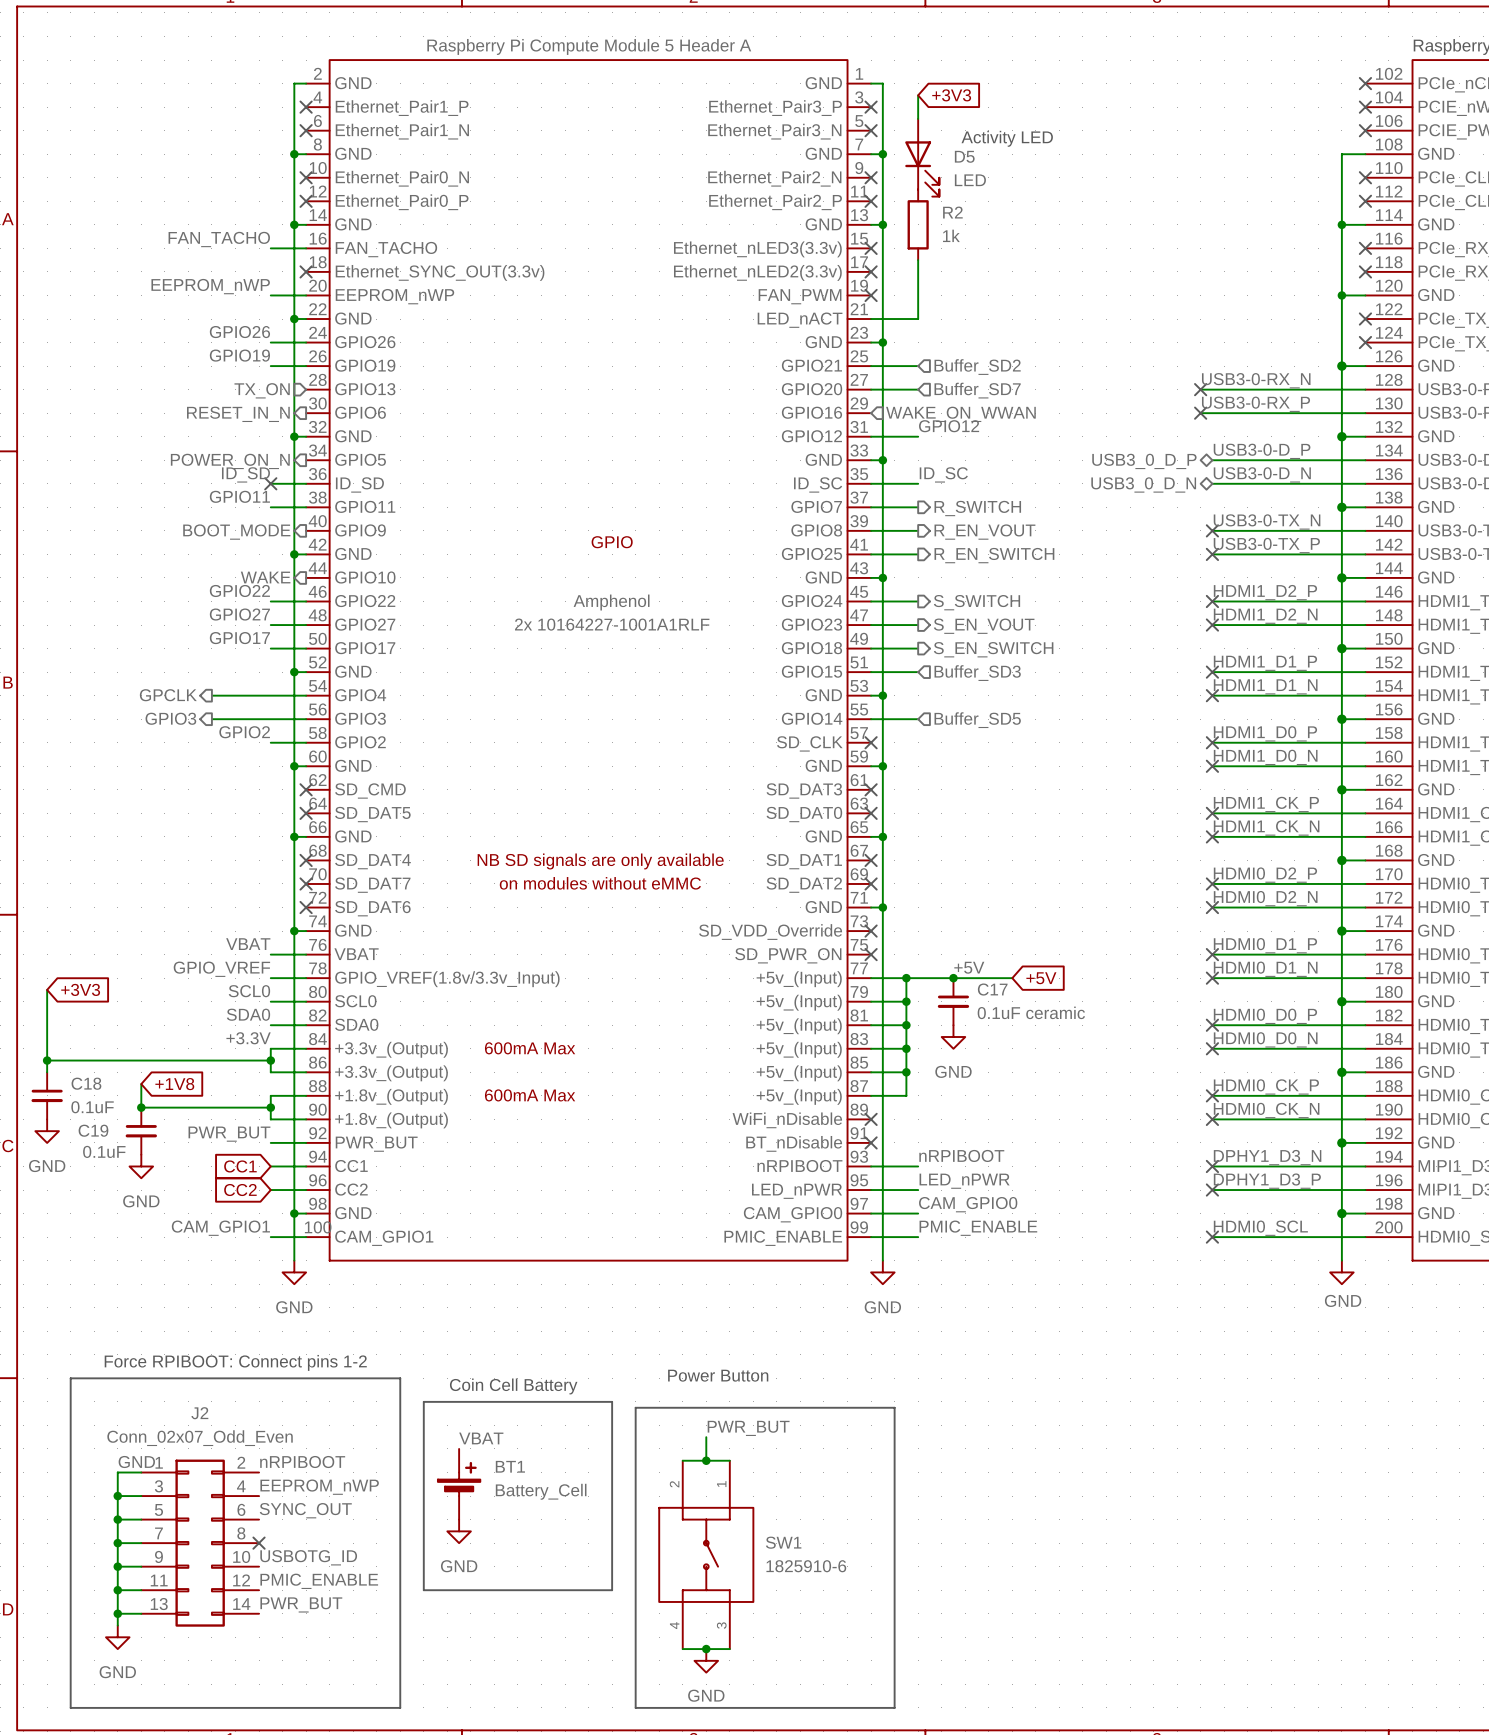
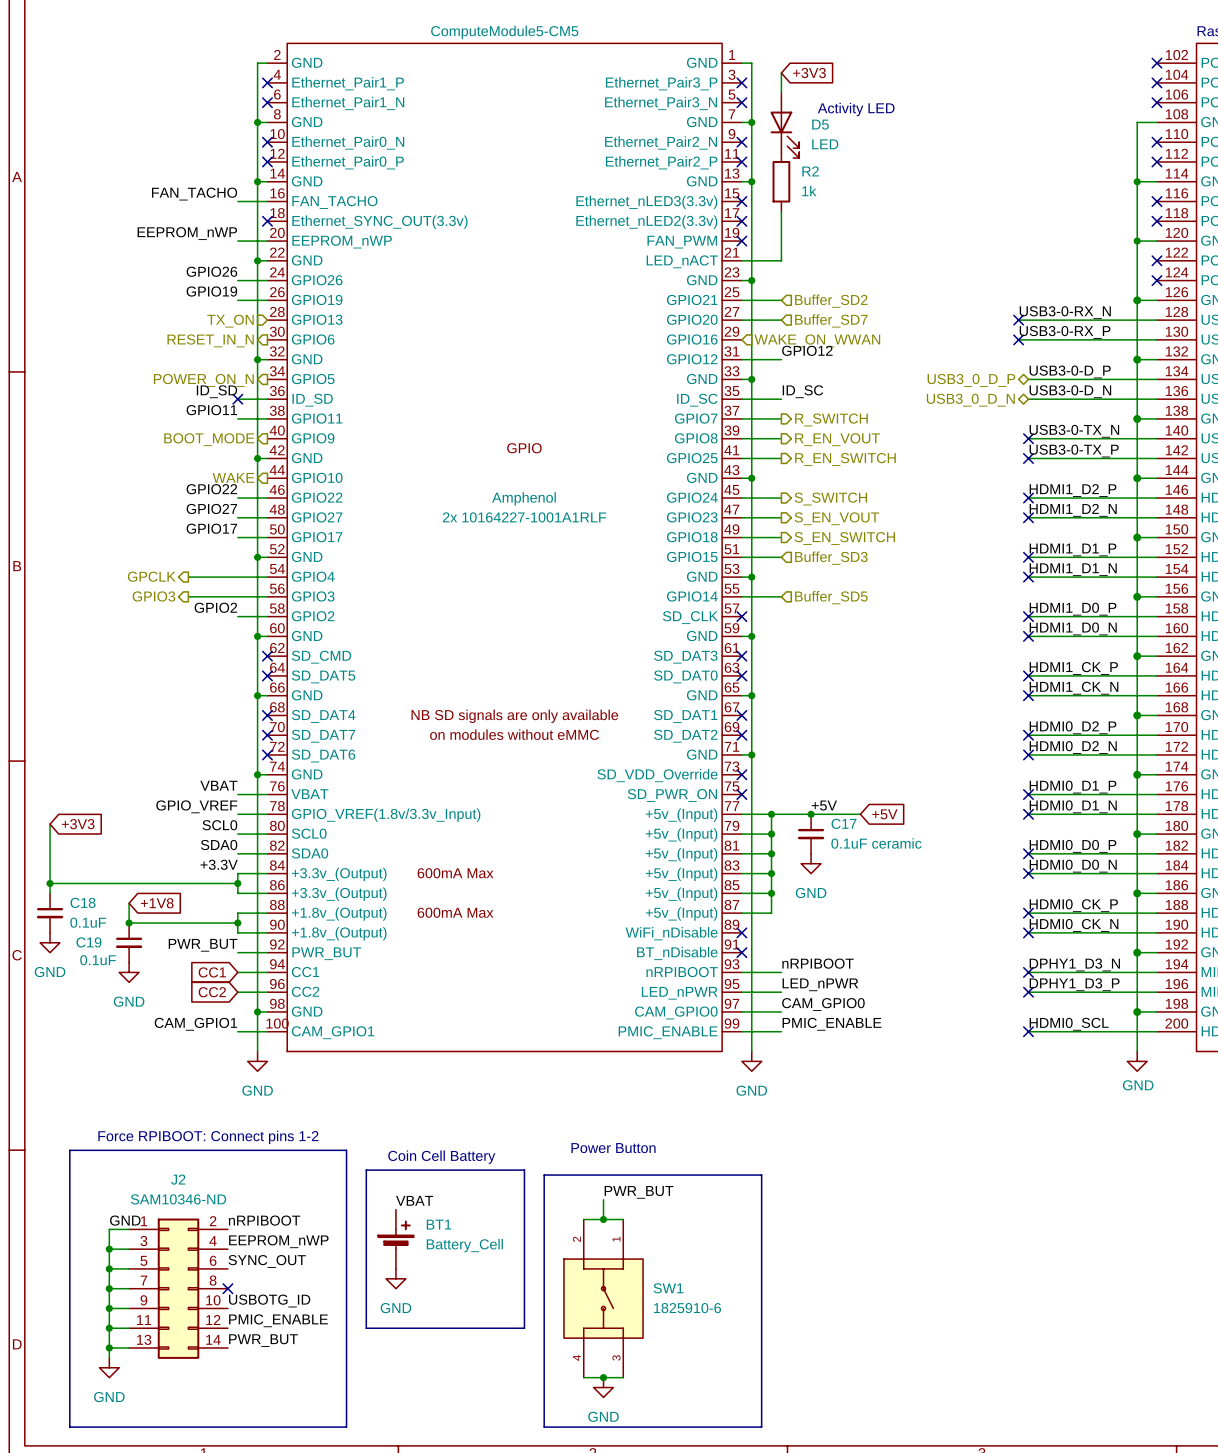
part value: Raspberry Pi Compute Module 5 Header A (589, 46) -> ComputeModule5-CM5 (504, 32)
J2 value: Conn_02x07_Odd_Even (200, 1438) -> SAM10346-ND (178, 1199)

